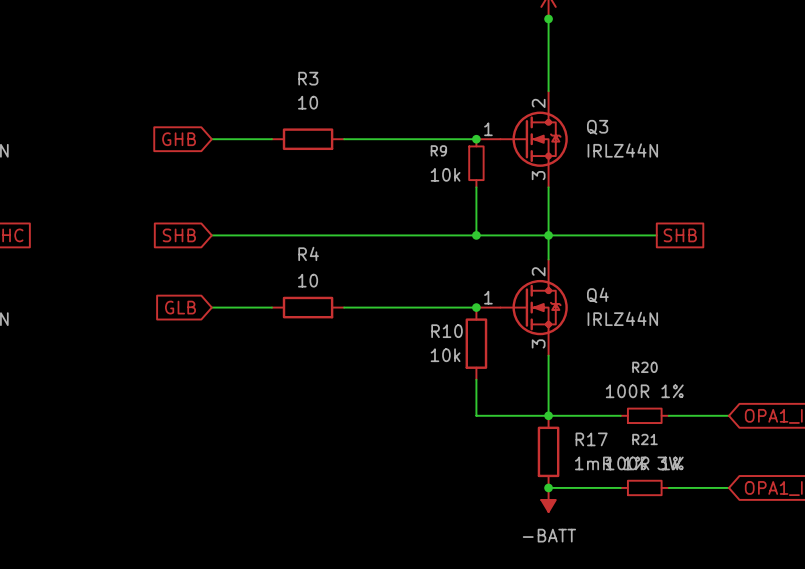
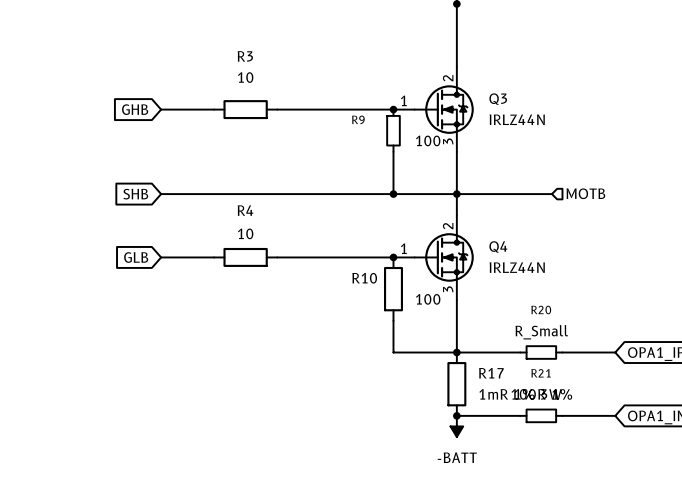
R9 value: 10k (445, 174) -> 100 (428, 140)
hierarchical label: none -> MOTB (585, 193)
global label: SHB (680, 235) -> none
R10 value: 10k (445, 355) -> 100 (428, 299)
R20 value: 100R 1% (644, 391) -> R_Small (541, 332)

